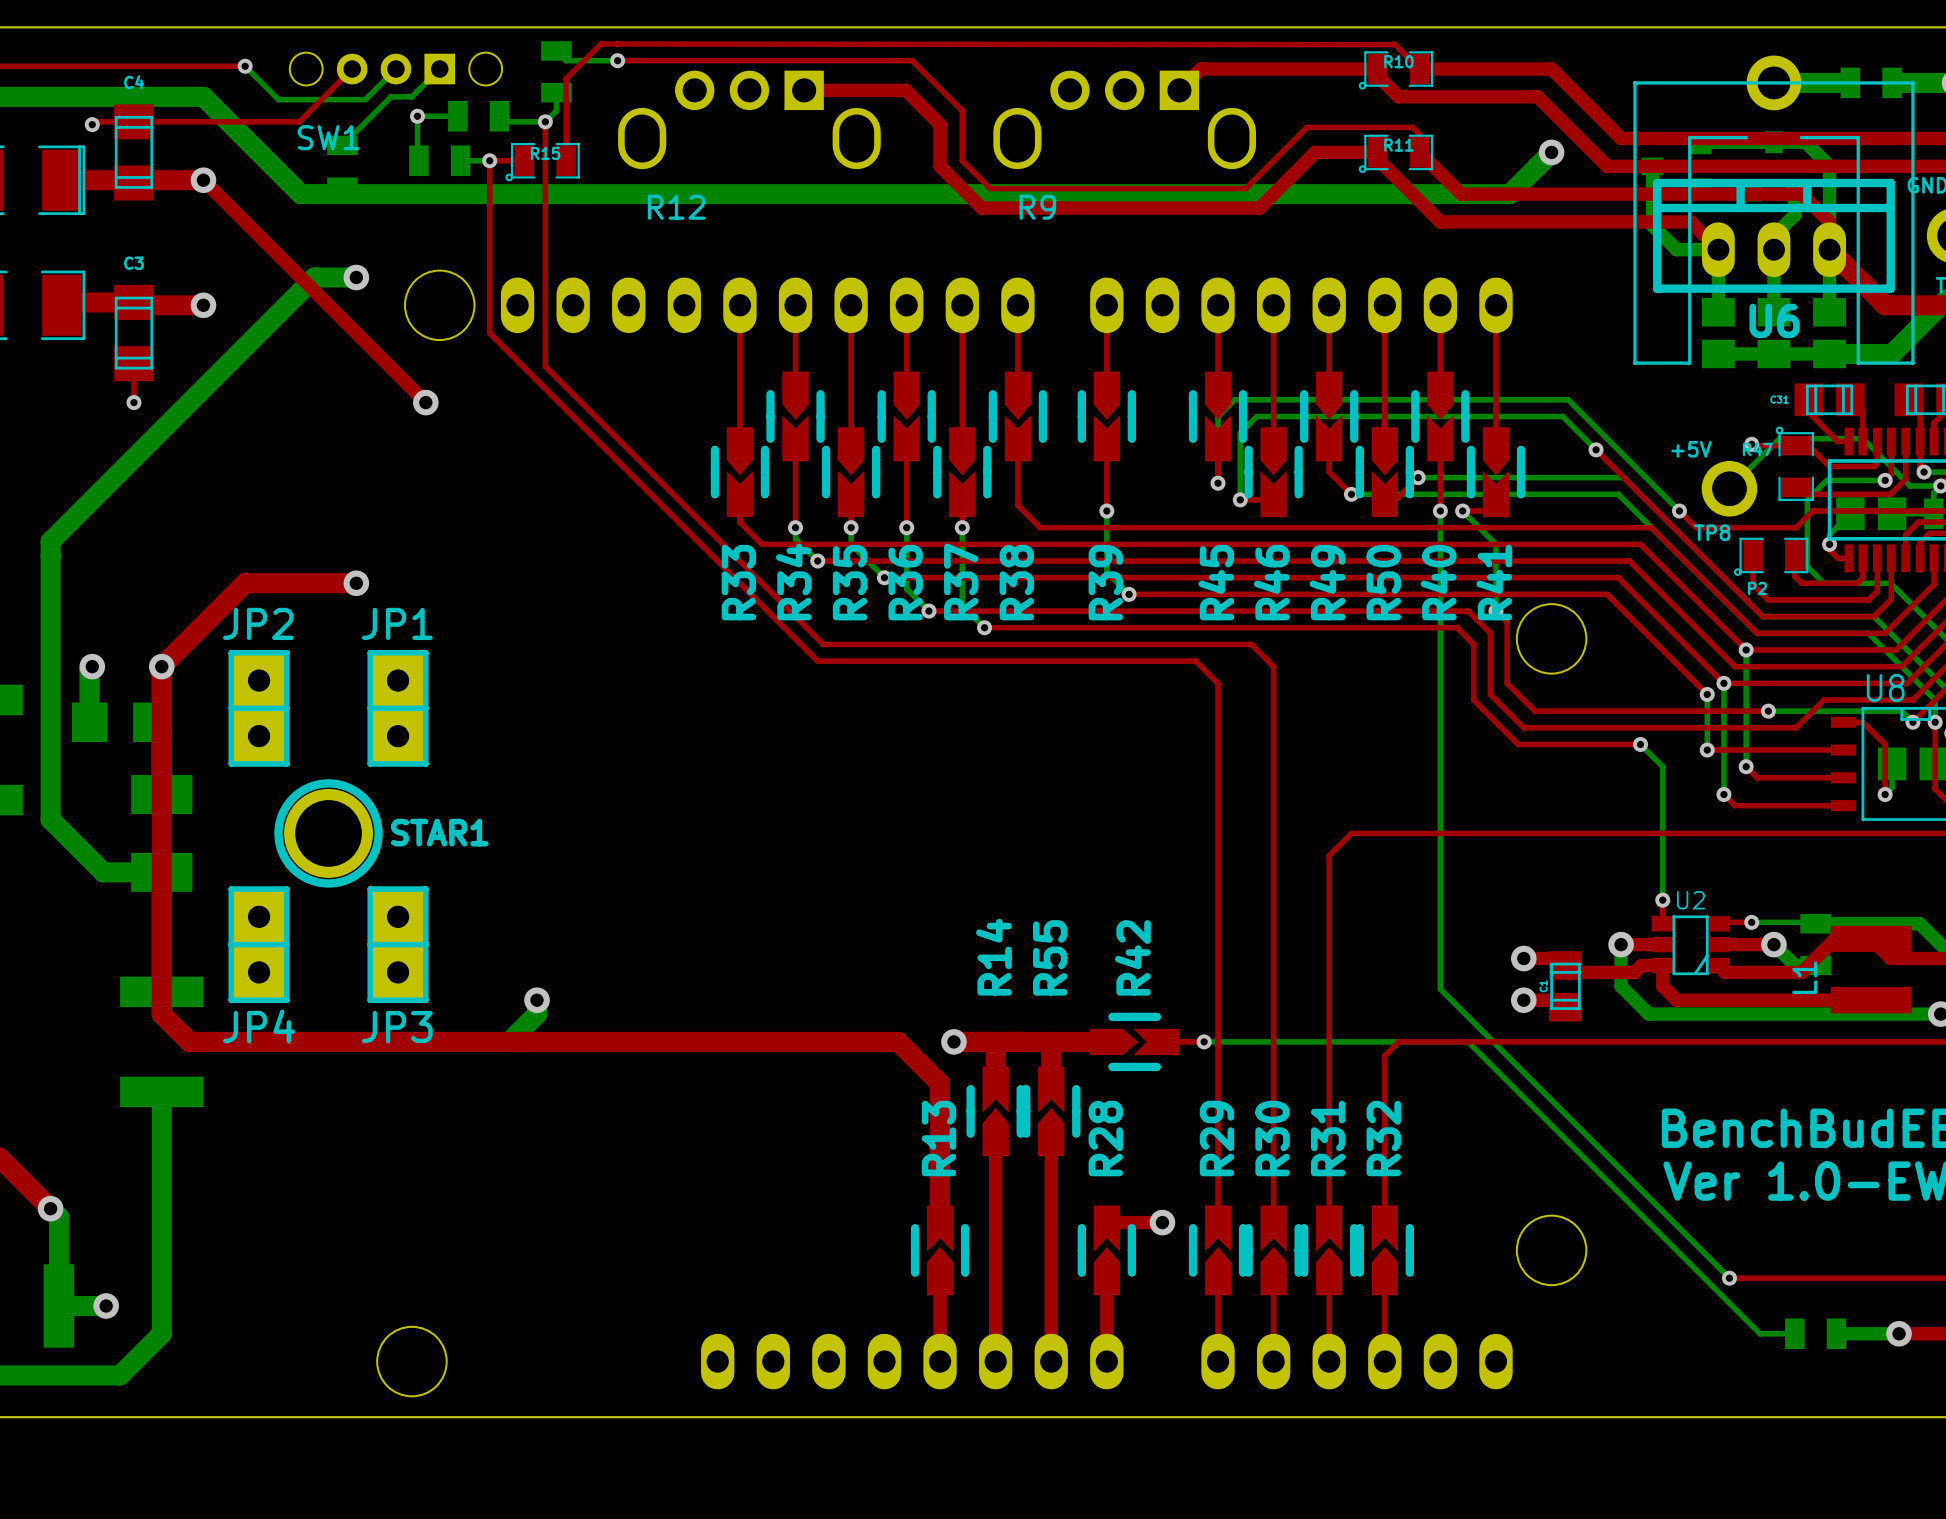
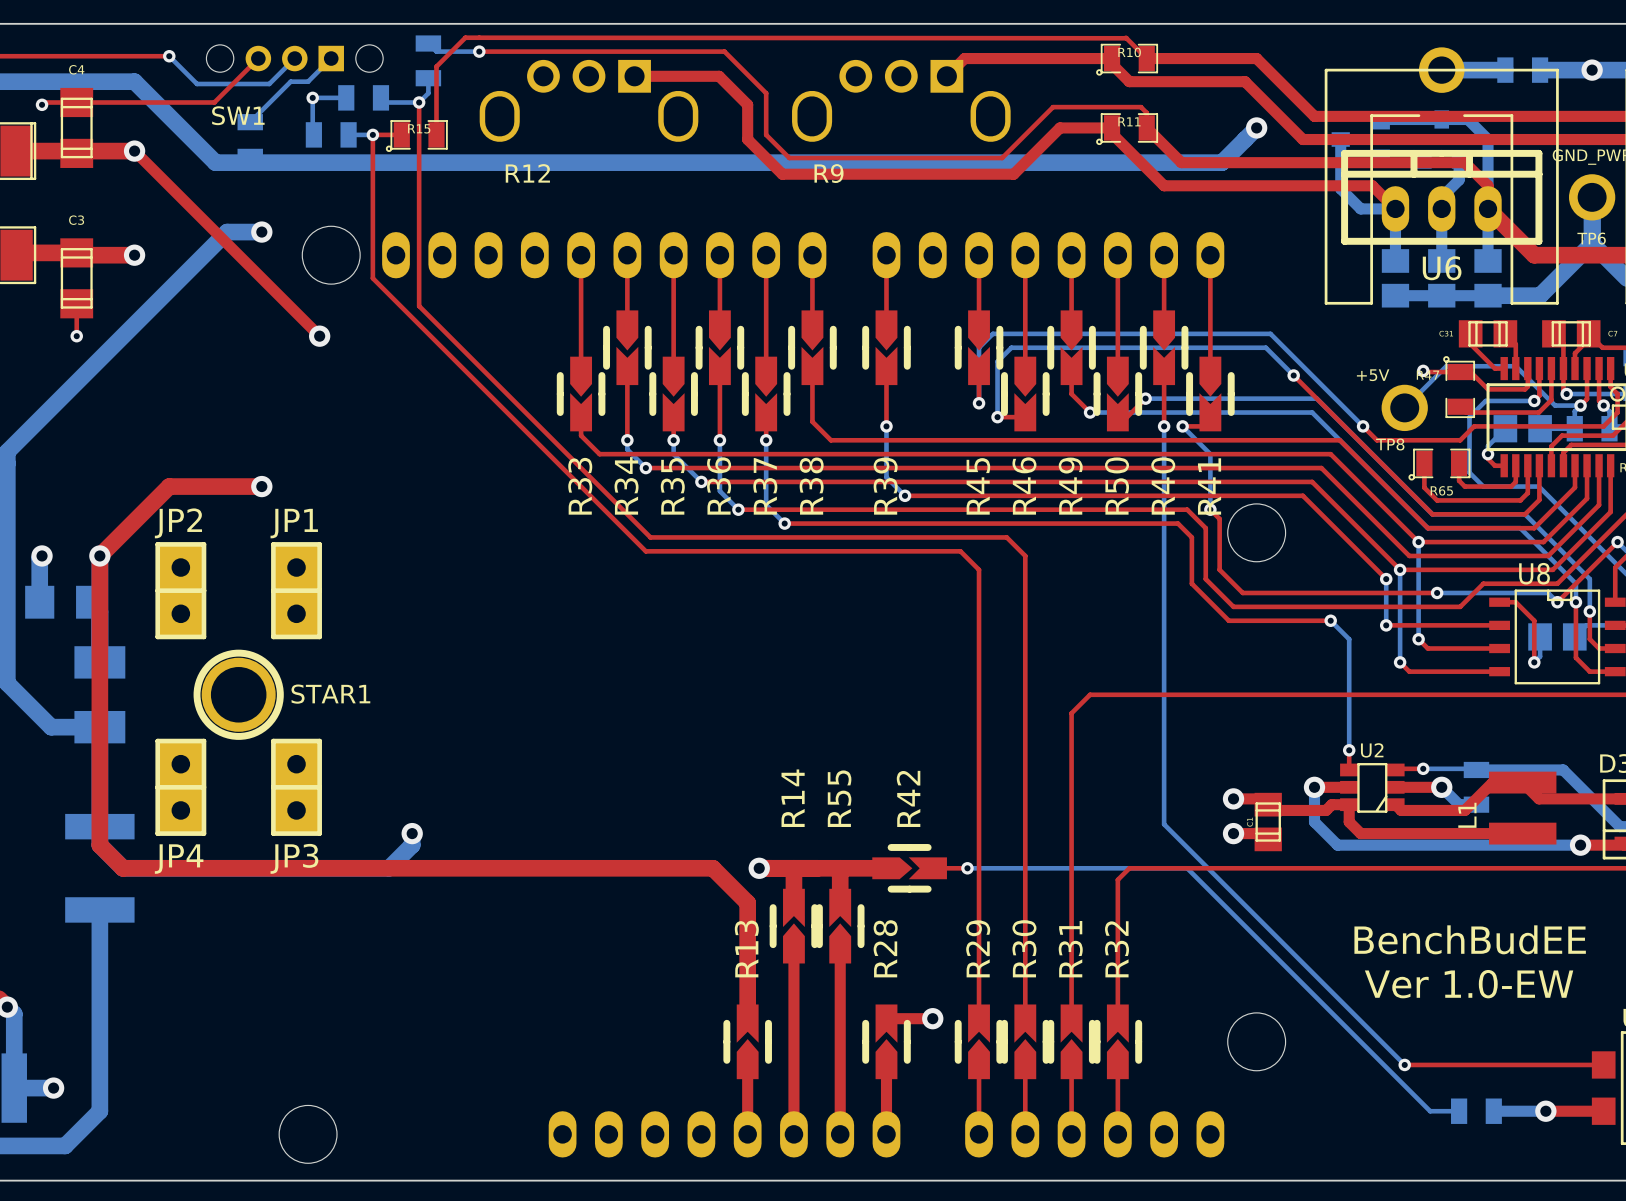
P2 name: P2 (1757, 588) -> R65 (1441, 490)

